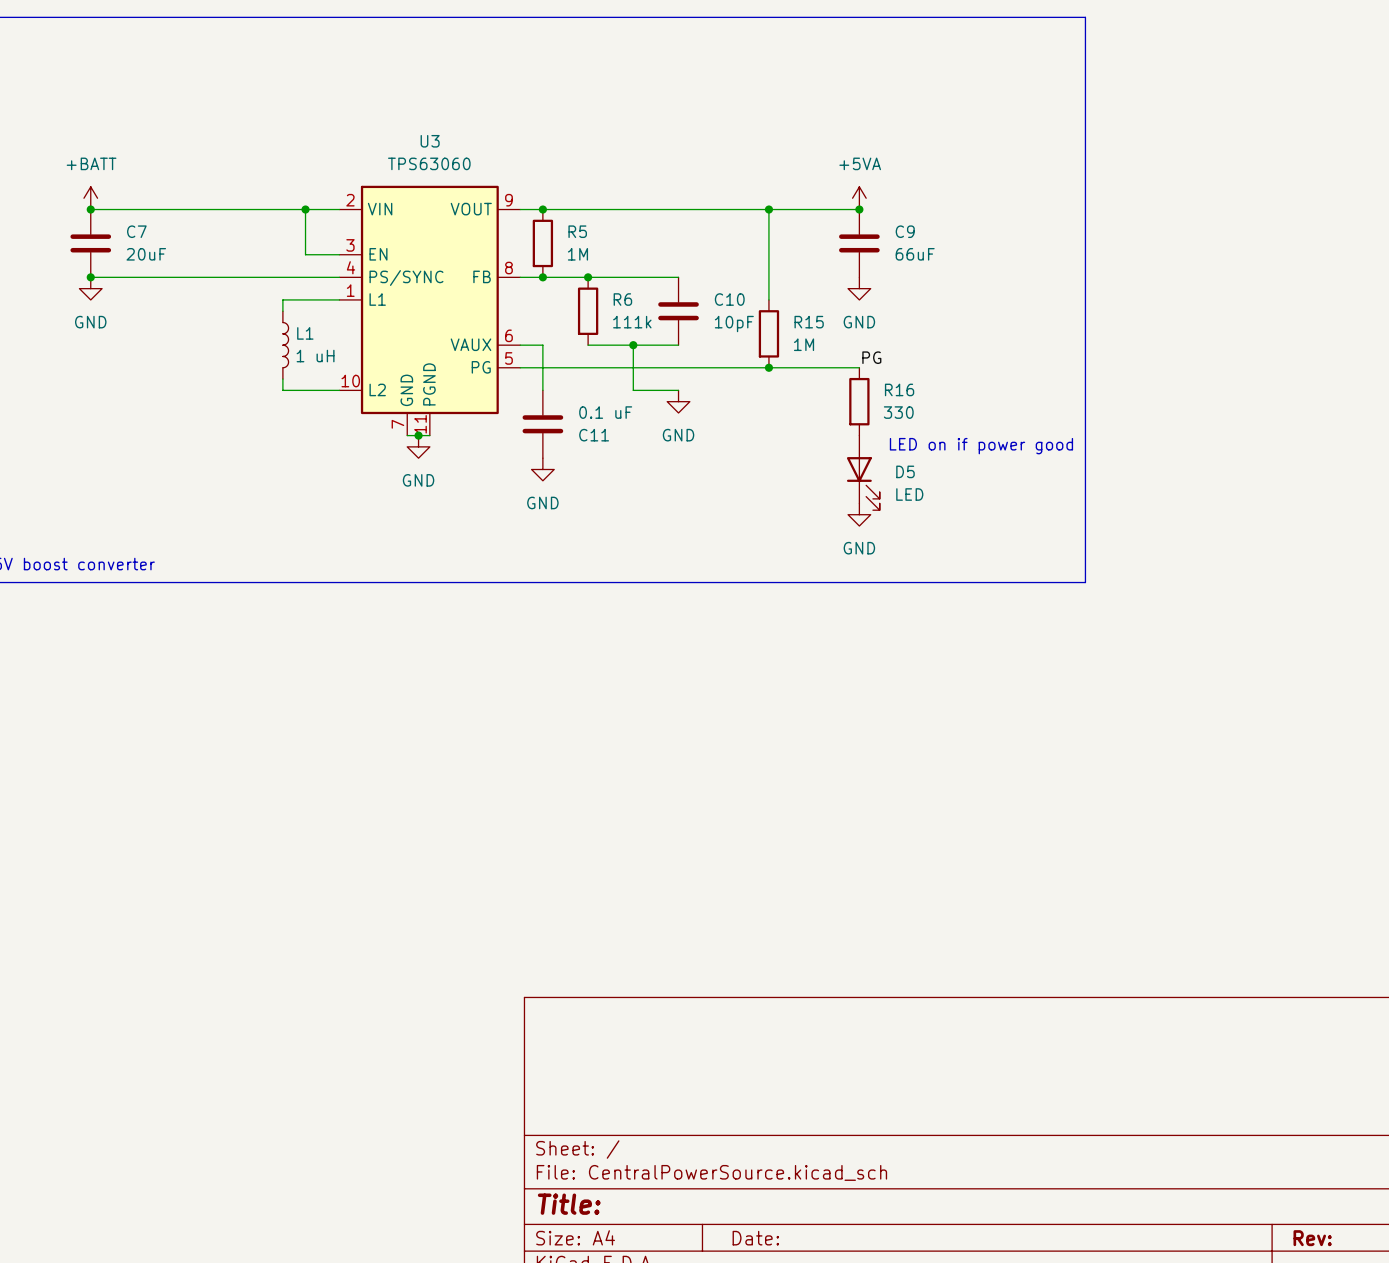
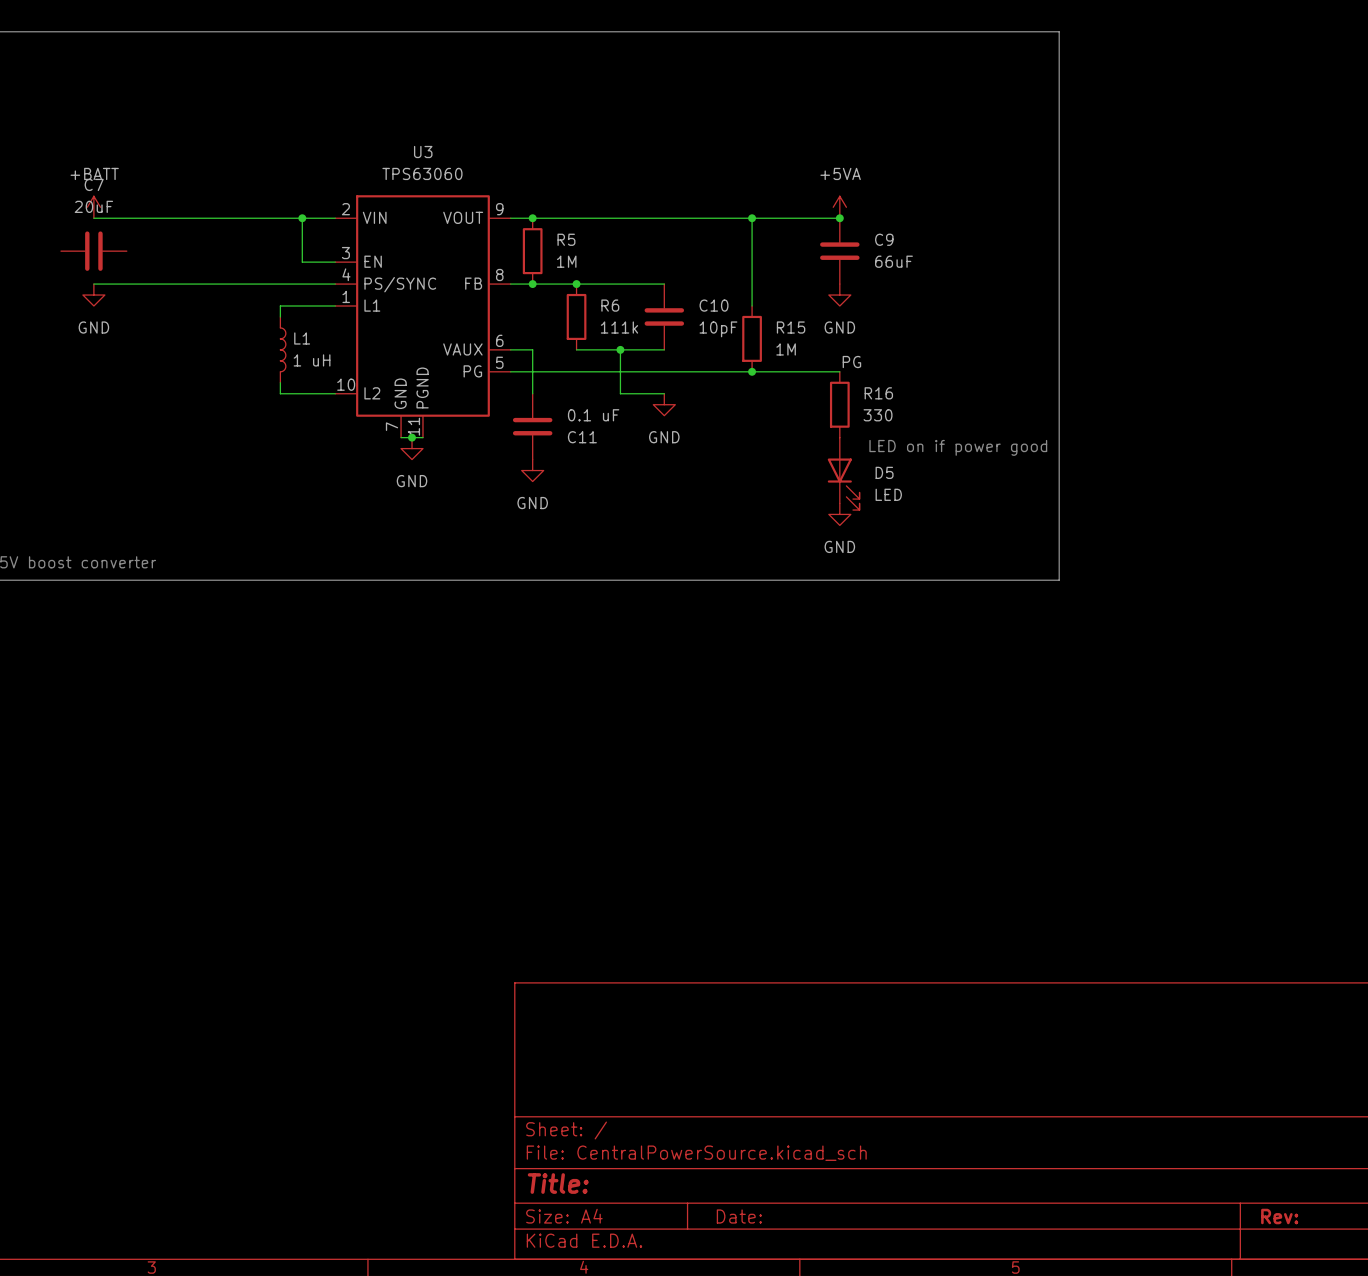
junction: (90, 209) -> none
C7 name position: C7 (136, 231) -> C7 (94, 184)
C7 rotation: 0° (90, 243) -> 90° clockwise (93, 251)
C7 value position: 20uF (146, 254) -> 20uF (93, 206)
junction: (90, 277) -> none

